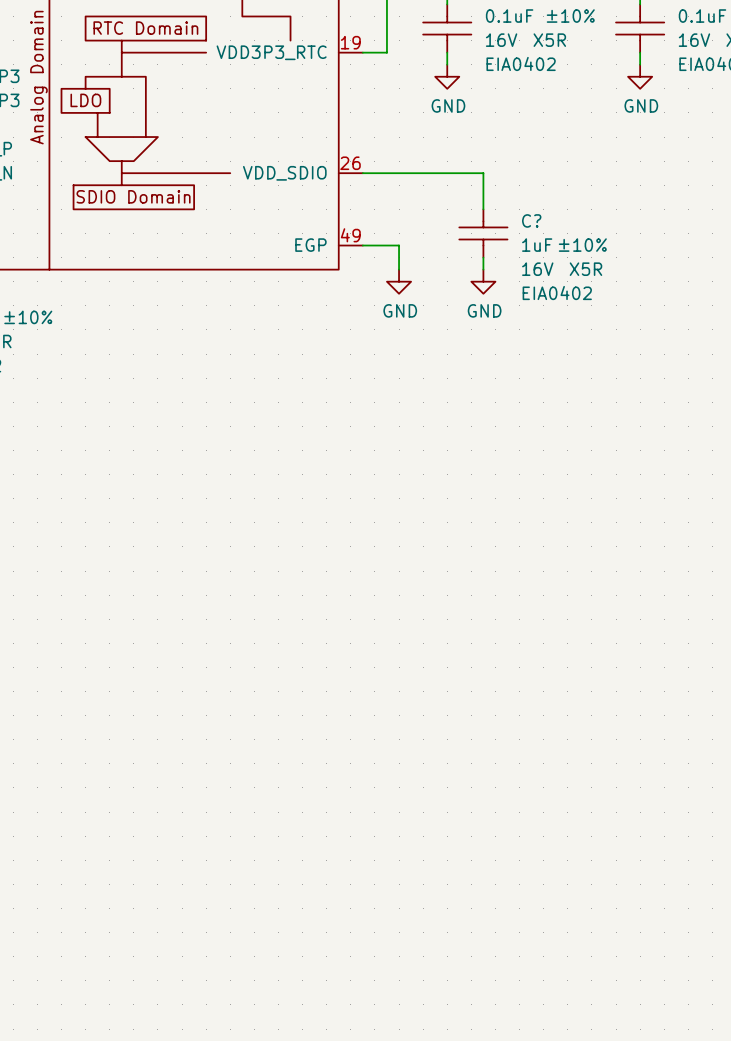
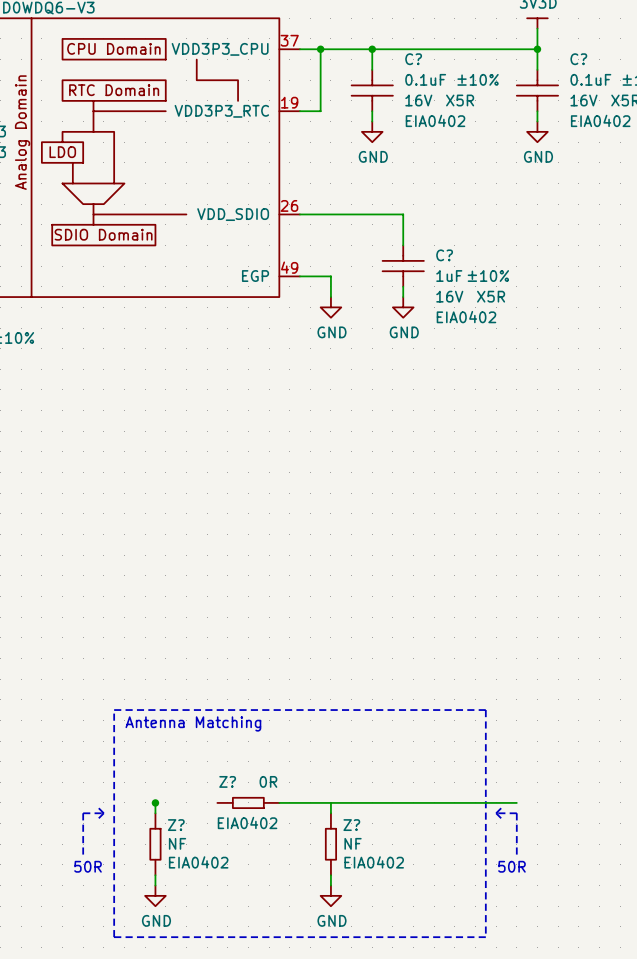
line: none -> (114, 710) (114, 937) (485, 937) (485, 710) (114, 710)
text: none -> Antenna Matching (193, 723)
wire: none -> (155, 802) (155, 813)
junction: none -> (155, 802)
Z?: none -> (248, 802)
wire: none -> (279, 802) (516, 802)
wire: none -> (330, 802) (330, 813)
line: none -> (98, 808) (103, 813)
line: none -> (501, 808) (496, 813)
line: none -> (103, 813) (83, 813) (83, 854)
line: none -> (103, 813) (98, 818)
line: none -> (496, 813) (516, 813) (516, 854)
line: none -> (496, 813) (501, 818)
Z?: none -> (155, 844)
Z?: none -> (330, 844)
text: none -> 50R (88, 866)
text: none -> 50R (511, 866)
wire: none -> (155, 875) (155, 885)
wire: none -> (330, 875) (330, 885)
power symbol: none -> GND (155, 895)
power symbol: none -> GND (330, 895)

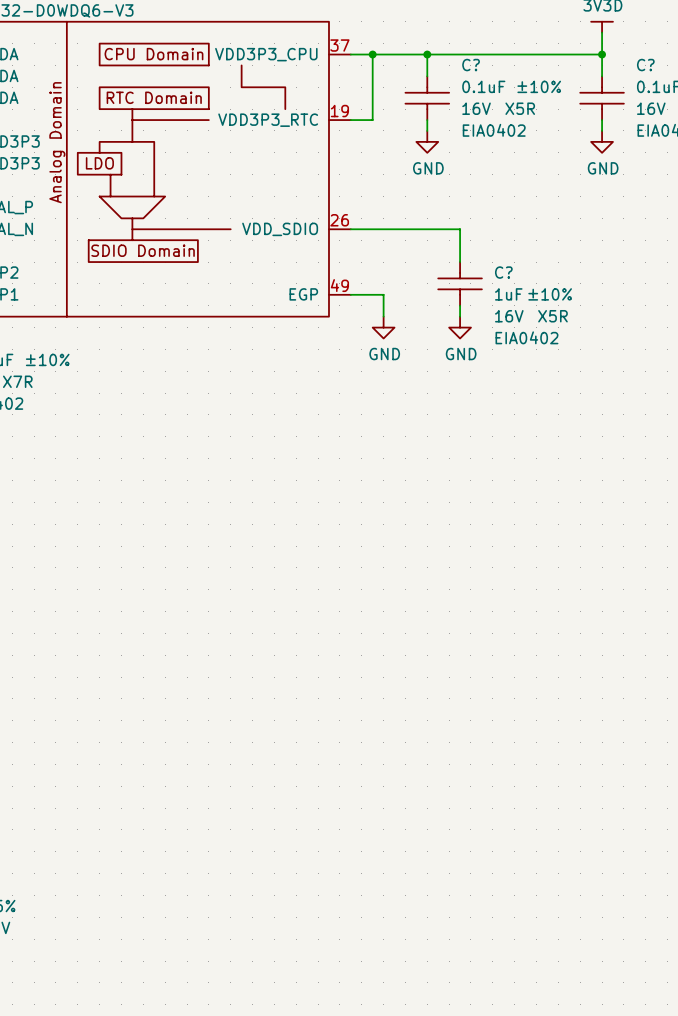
line: (114, 710) (114, 937) (485, 937) (485, 710) (114, 710) -> none
text: Antenna Matching (193, 723) -> none
wire: (155, 802) (155, 813) -> none
junction: (155, 802) -> none
Z?: (248, 802) -> none
wire: (279, 802) (516, 802) -> none
wire: (330, 802) (330, 813) -> none
line: (98, 808) (103, 813) -> none
line: (501, 808) (496, 813) -> none
line: (103, 813) (83, 813) (83, 854) -> none
line: (103, 813) (98, 818) -> none
line: (496, 813) (516, 813) (516, 854) -> none
line: (496, 813) (501, 818) -> none
Z?: (155, 844) -> none
Z?: (330, 844) -> none
text: 50R (88, 866) -> none
text: 50R (511, 866) -> none
wire: (155, 875) (155, 885) -> none
wire: (330, 875) (330, 885) -> none
power symbol: GND (155, 895) -> none
power symbol: GND (330, 895) -> none

